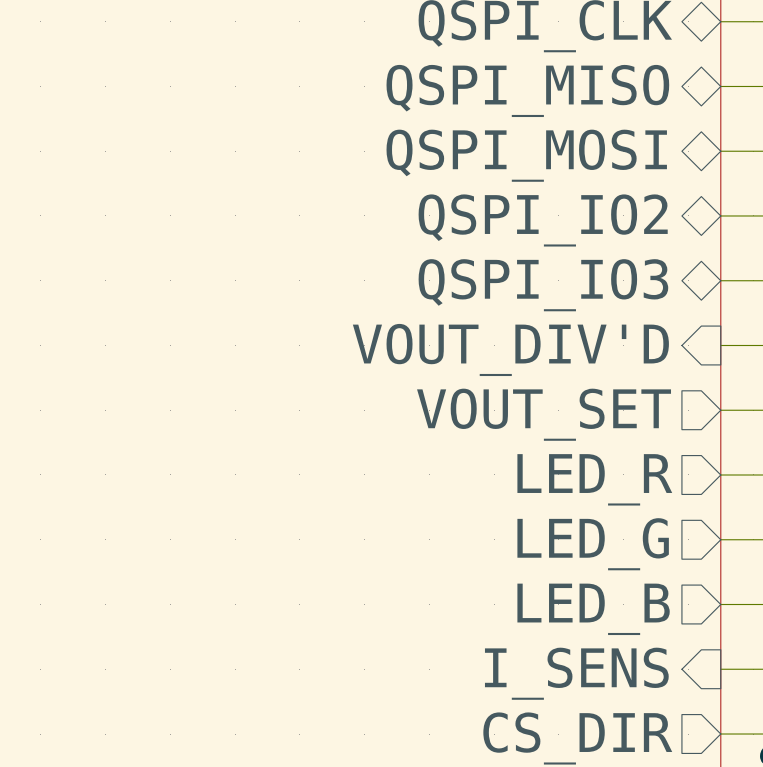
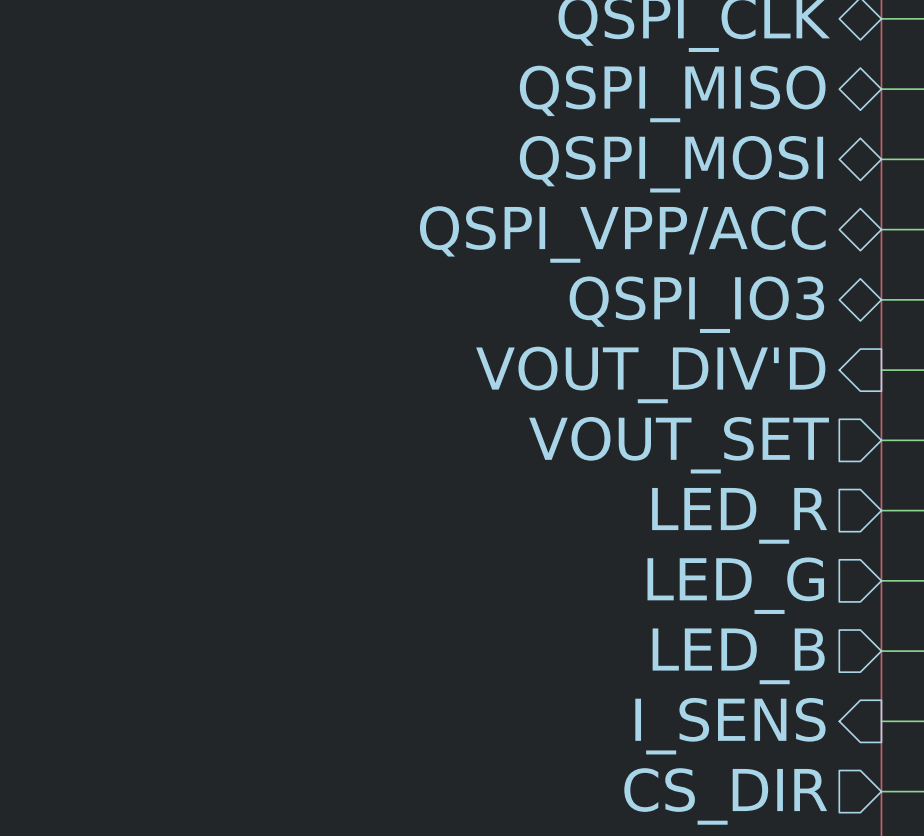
sheet pin: QSPI_IO2 (543, 220) -> QSPI_VPP/ACC (622, 234)

